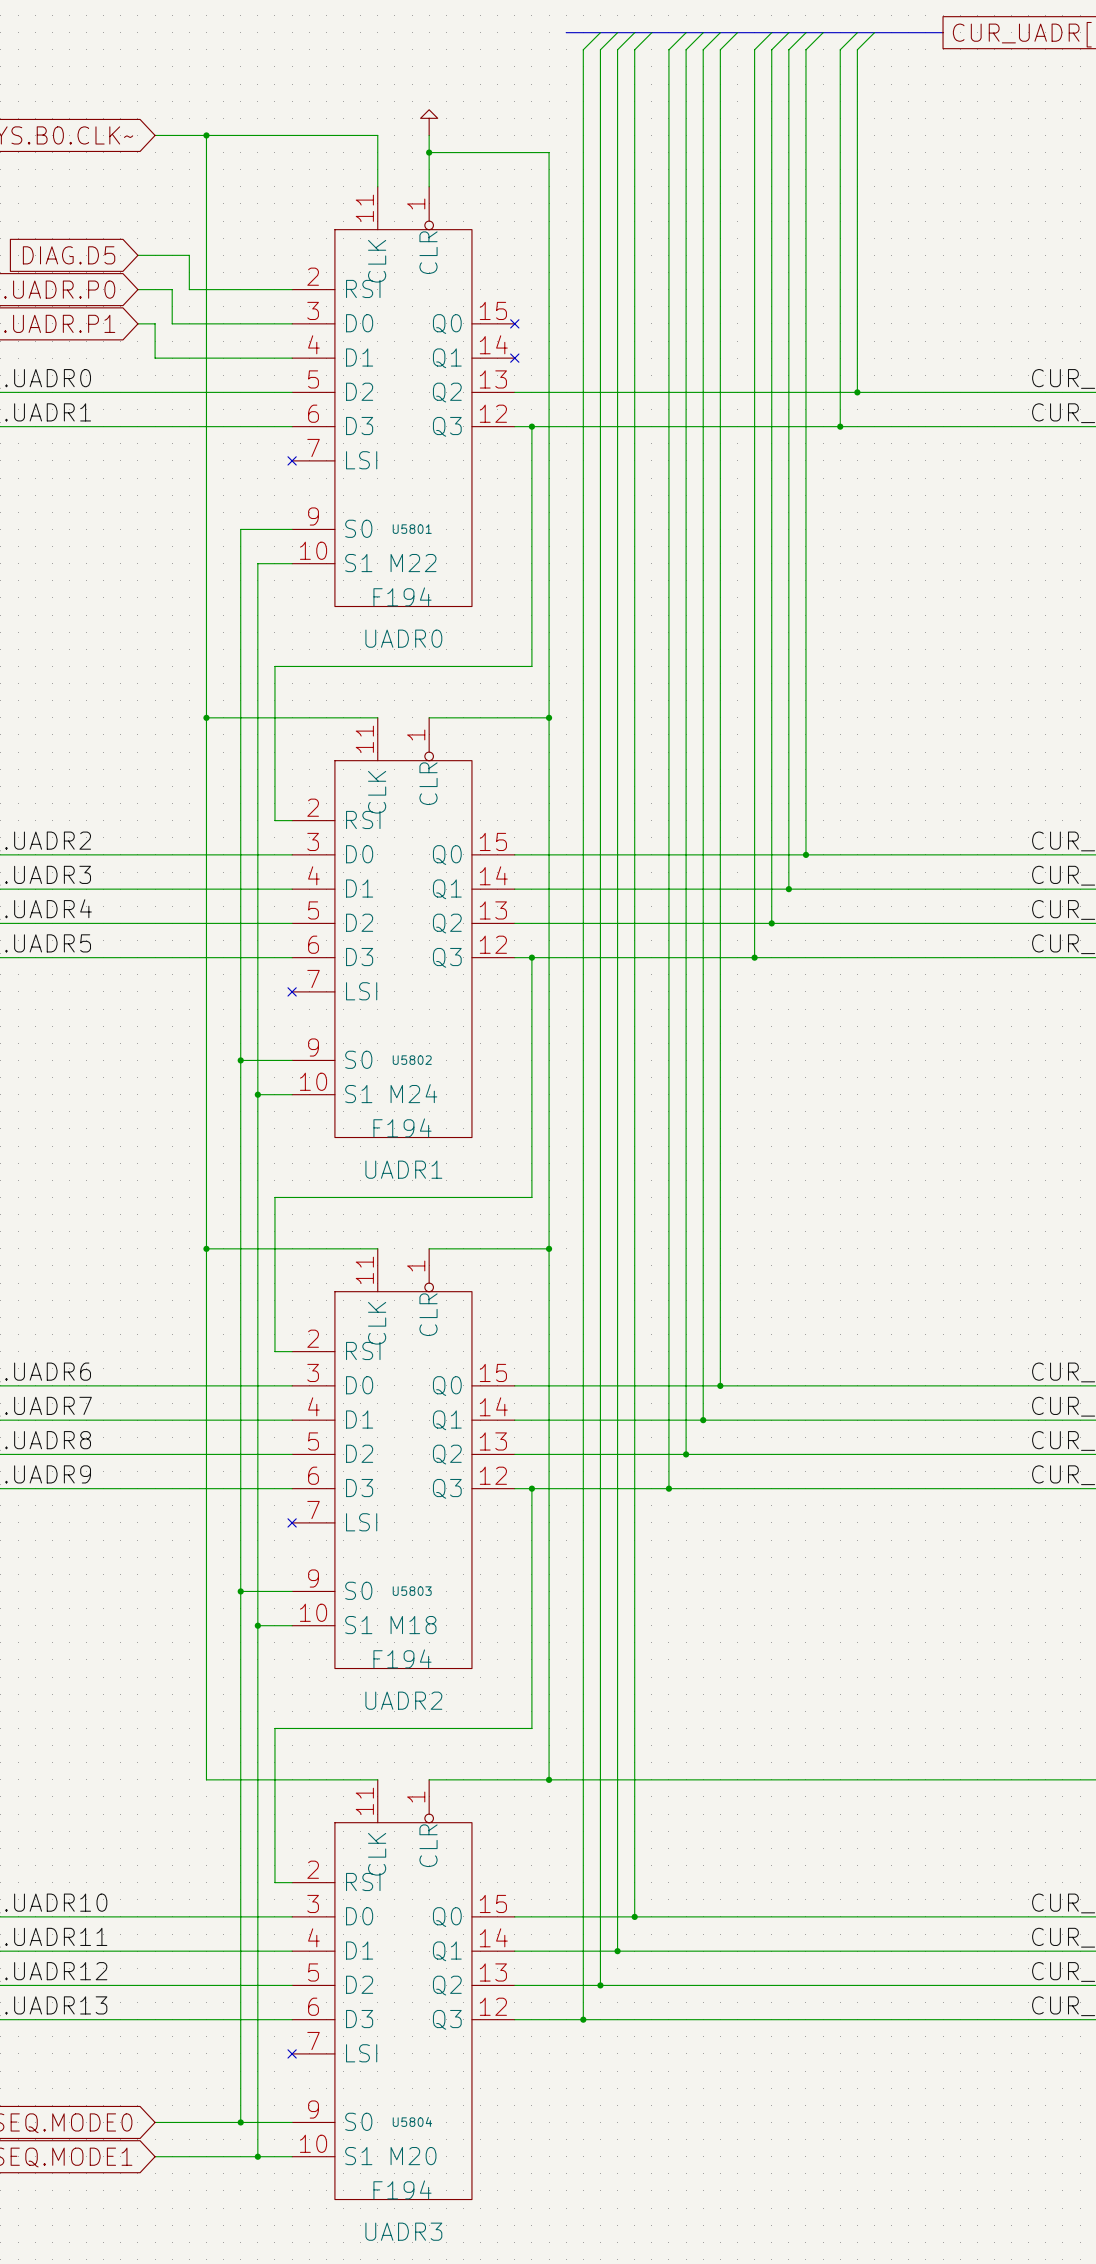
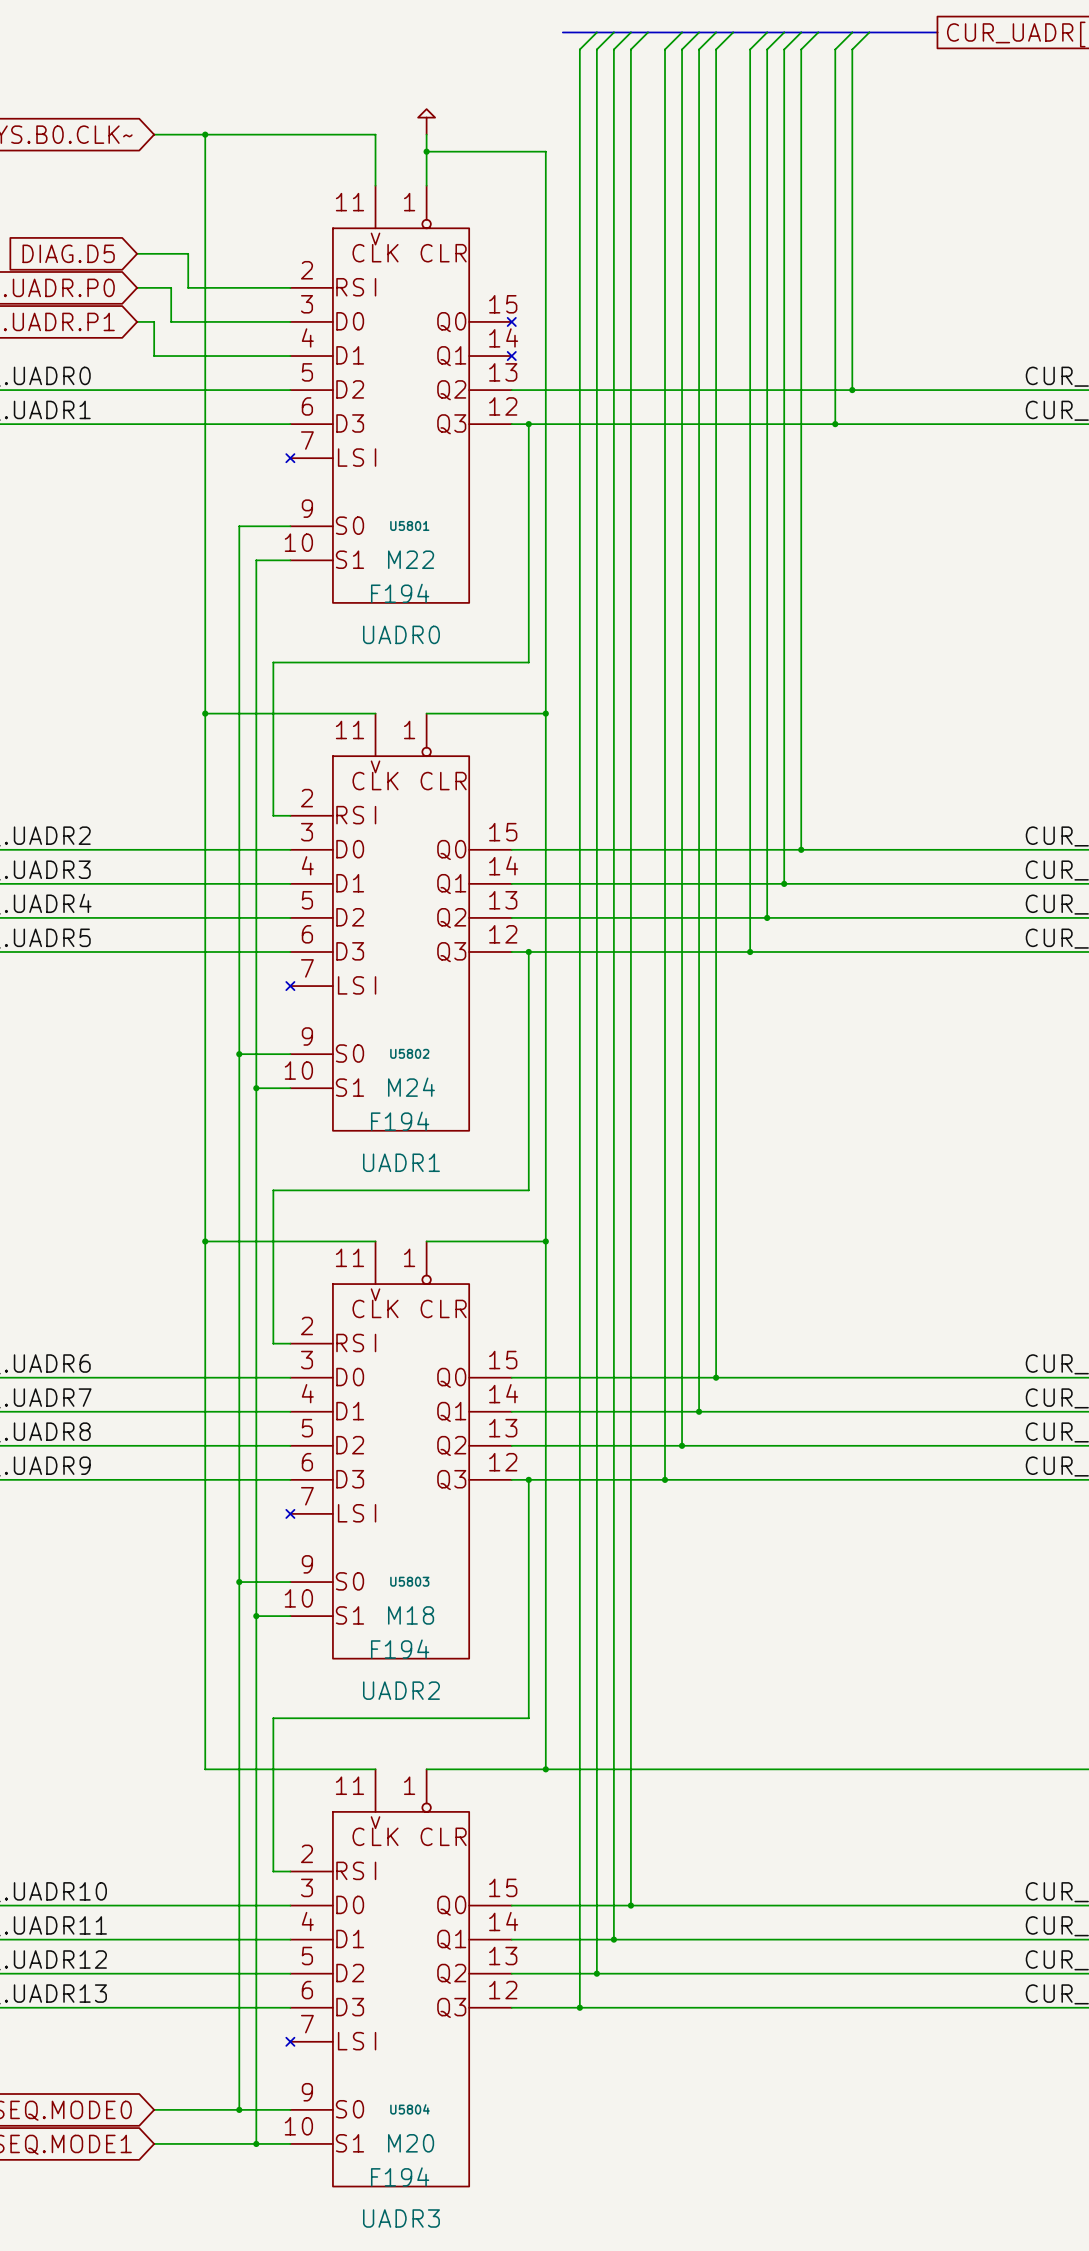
U5801 symbol: [292, 186, 515, 607] -> [290, 185, 512, 603]
U5802 symbol: [292, 717, 515, 1138] -> [290, 713, 512, 1131]
U5803 symbol: [292, 1248, 515, 1669] -> [290, 1241, 512, 1659]
U5804 symbol: [292, 1779, 515, 2200] -> [290, 1769, 512, 2187]

